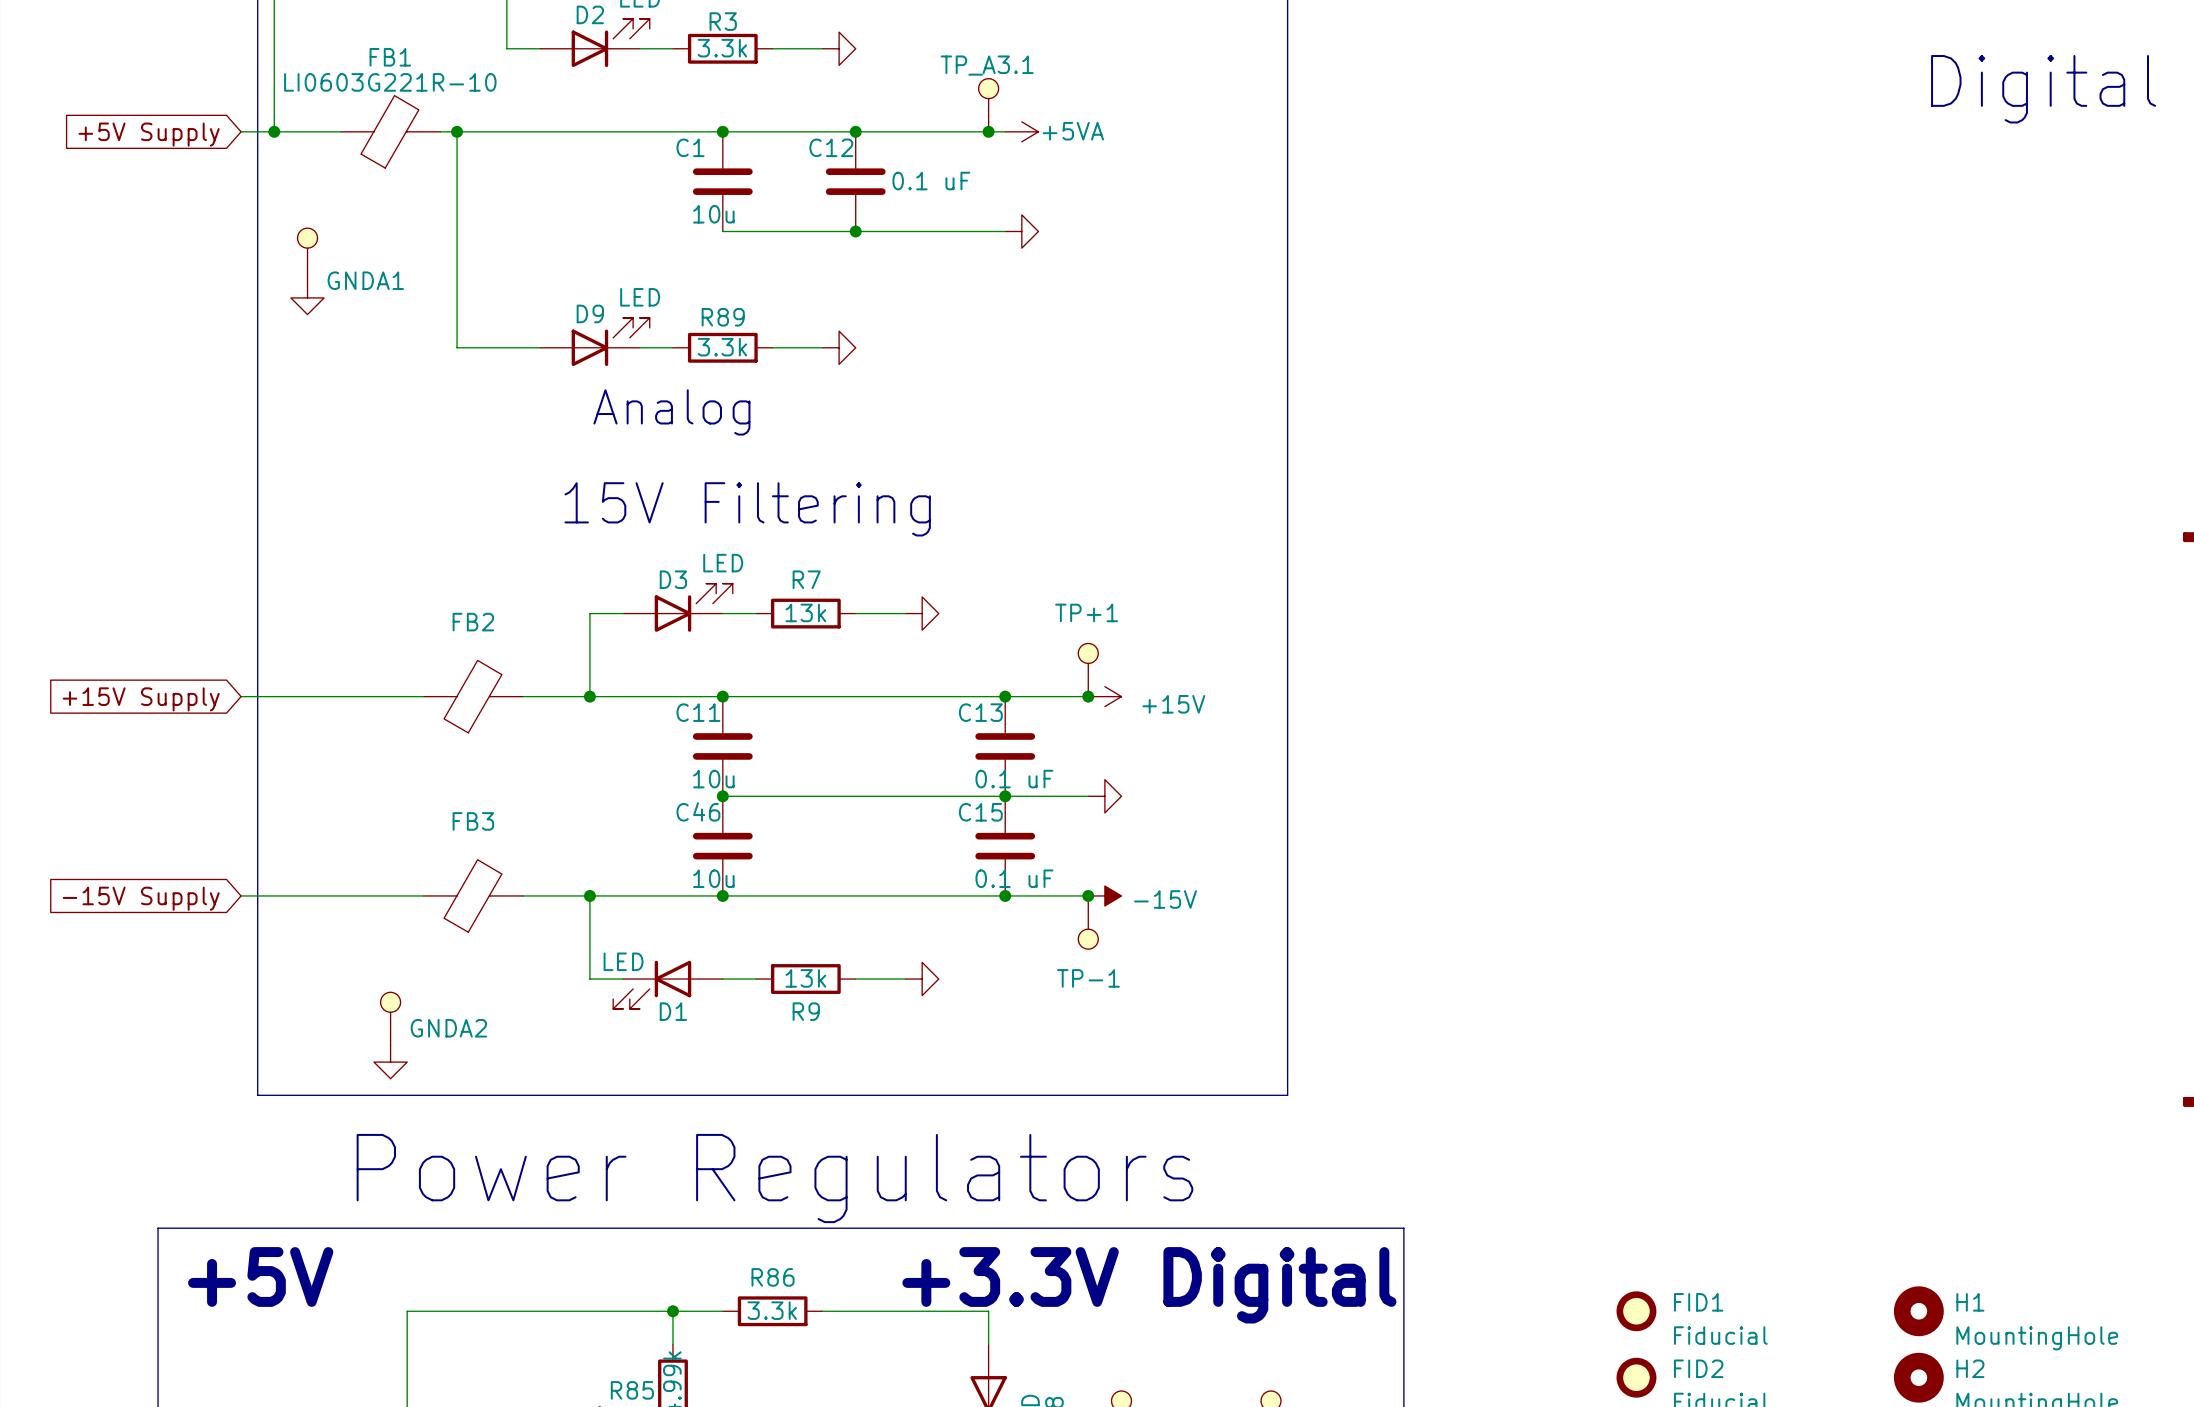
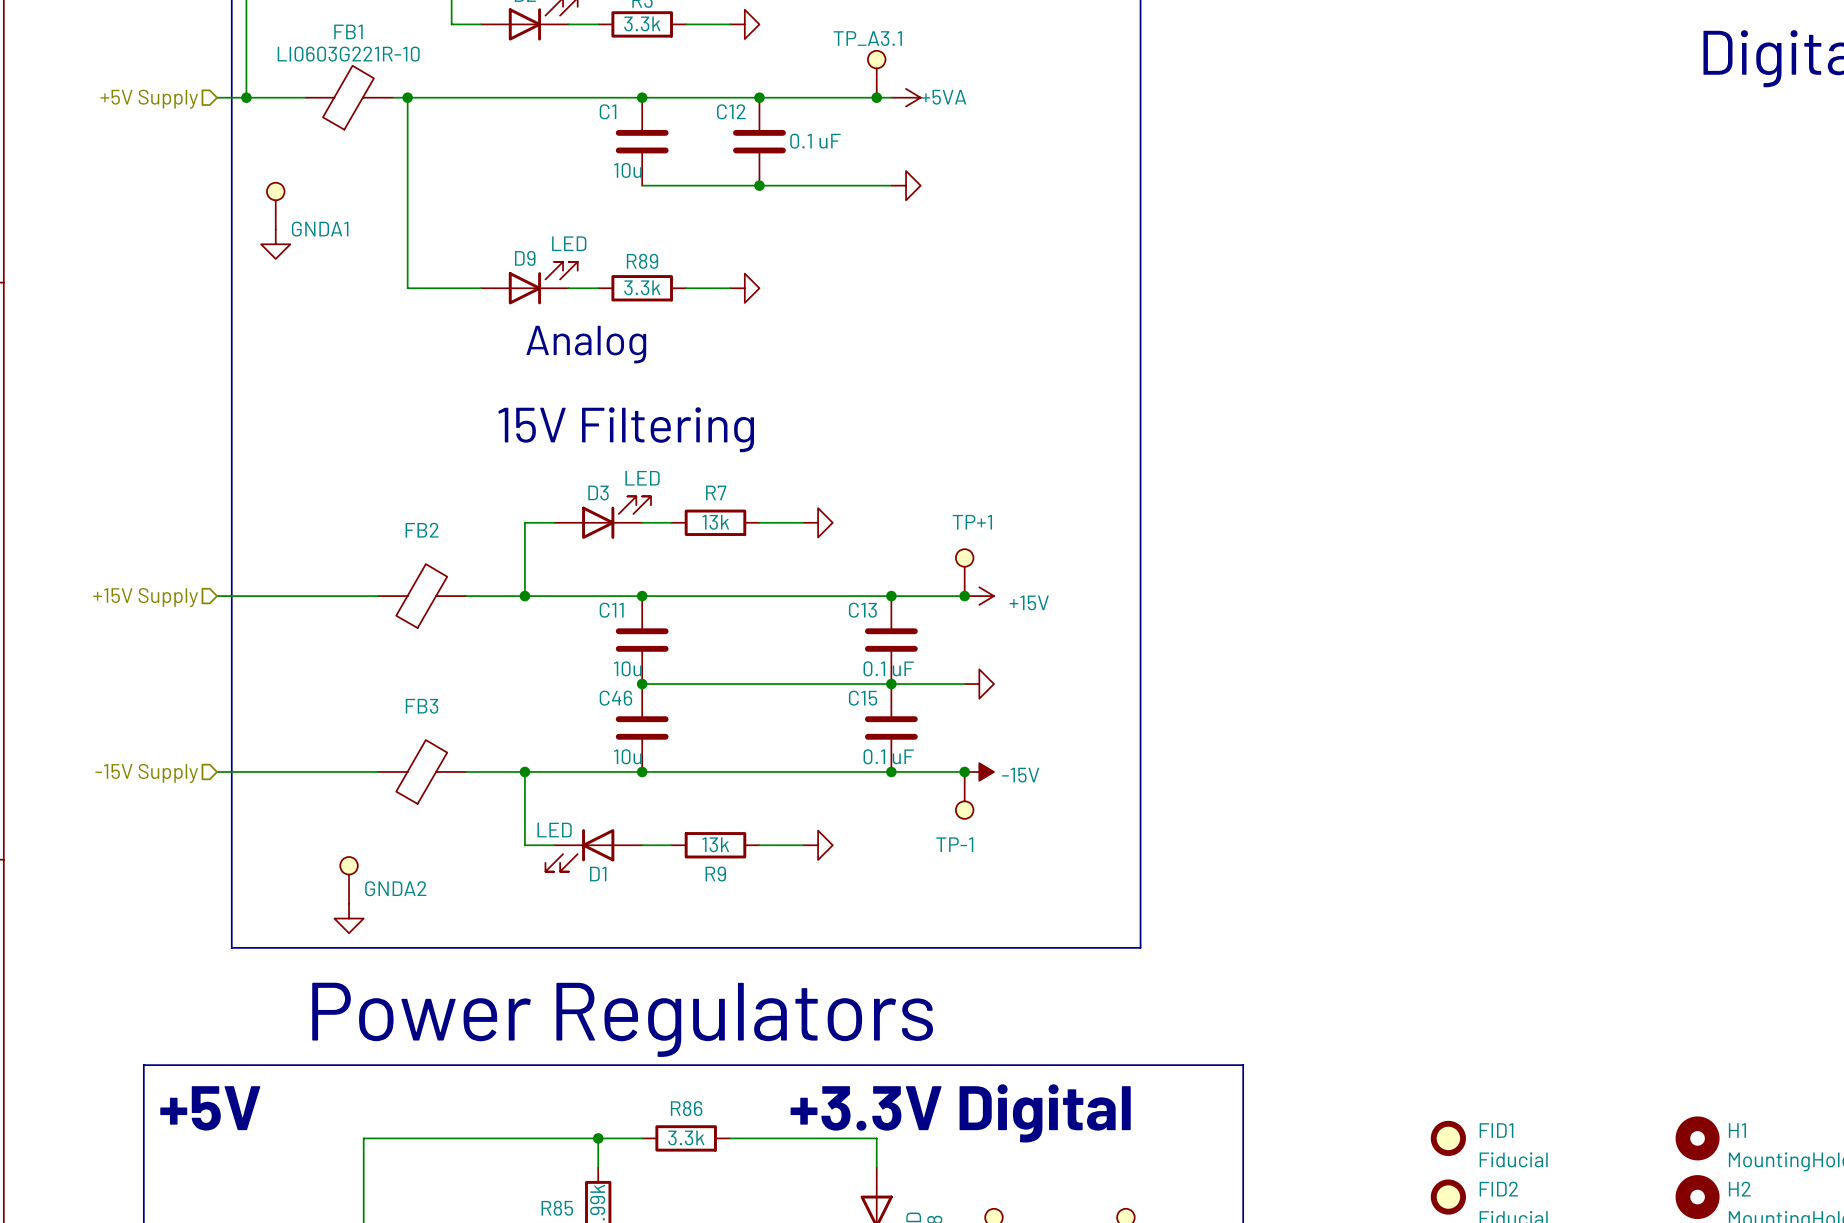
hierarchical label: none -> +5V Supply (149, 99)
global label: +5V Supply (149, 134) -> none
hierarchical label: none -> +15V Supply (145, 597)
global label: +15V Supply (141, 699) -> none
hierarchical label: none -> -15V Supply (146, 773)
global label: -15V Supply (141, 898) -> none

